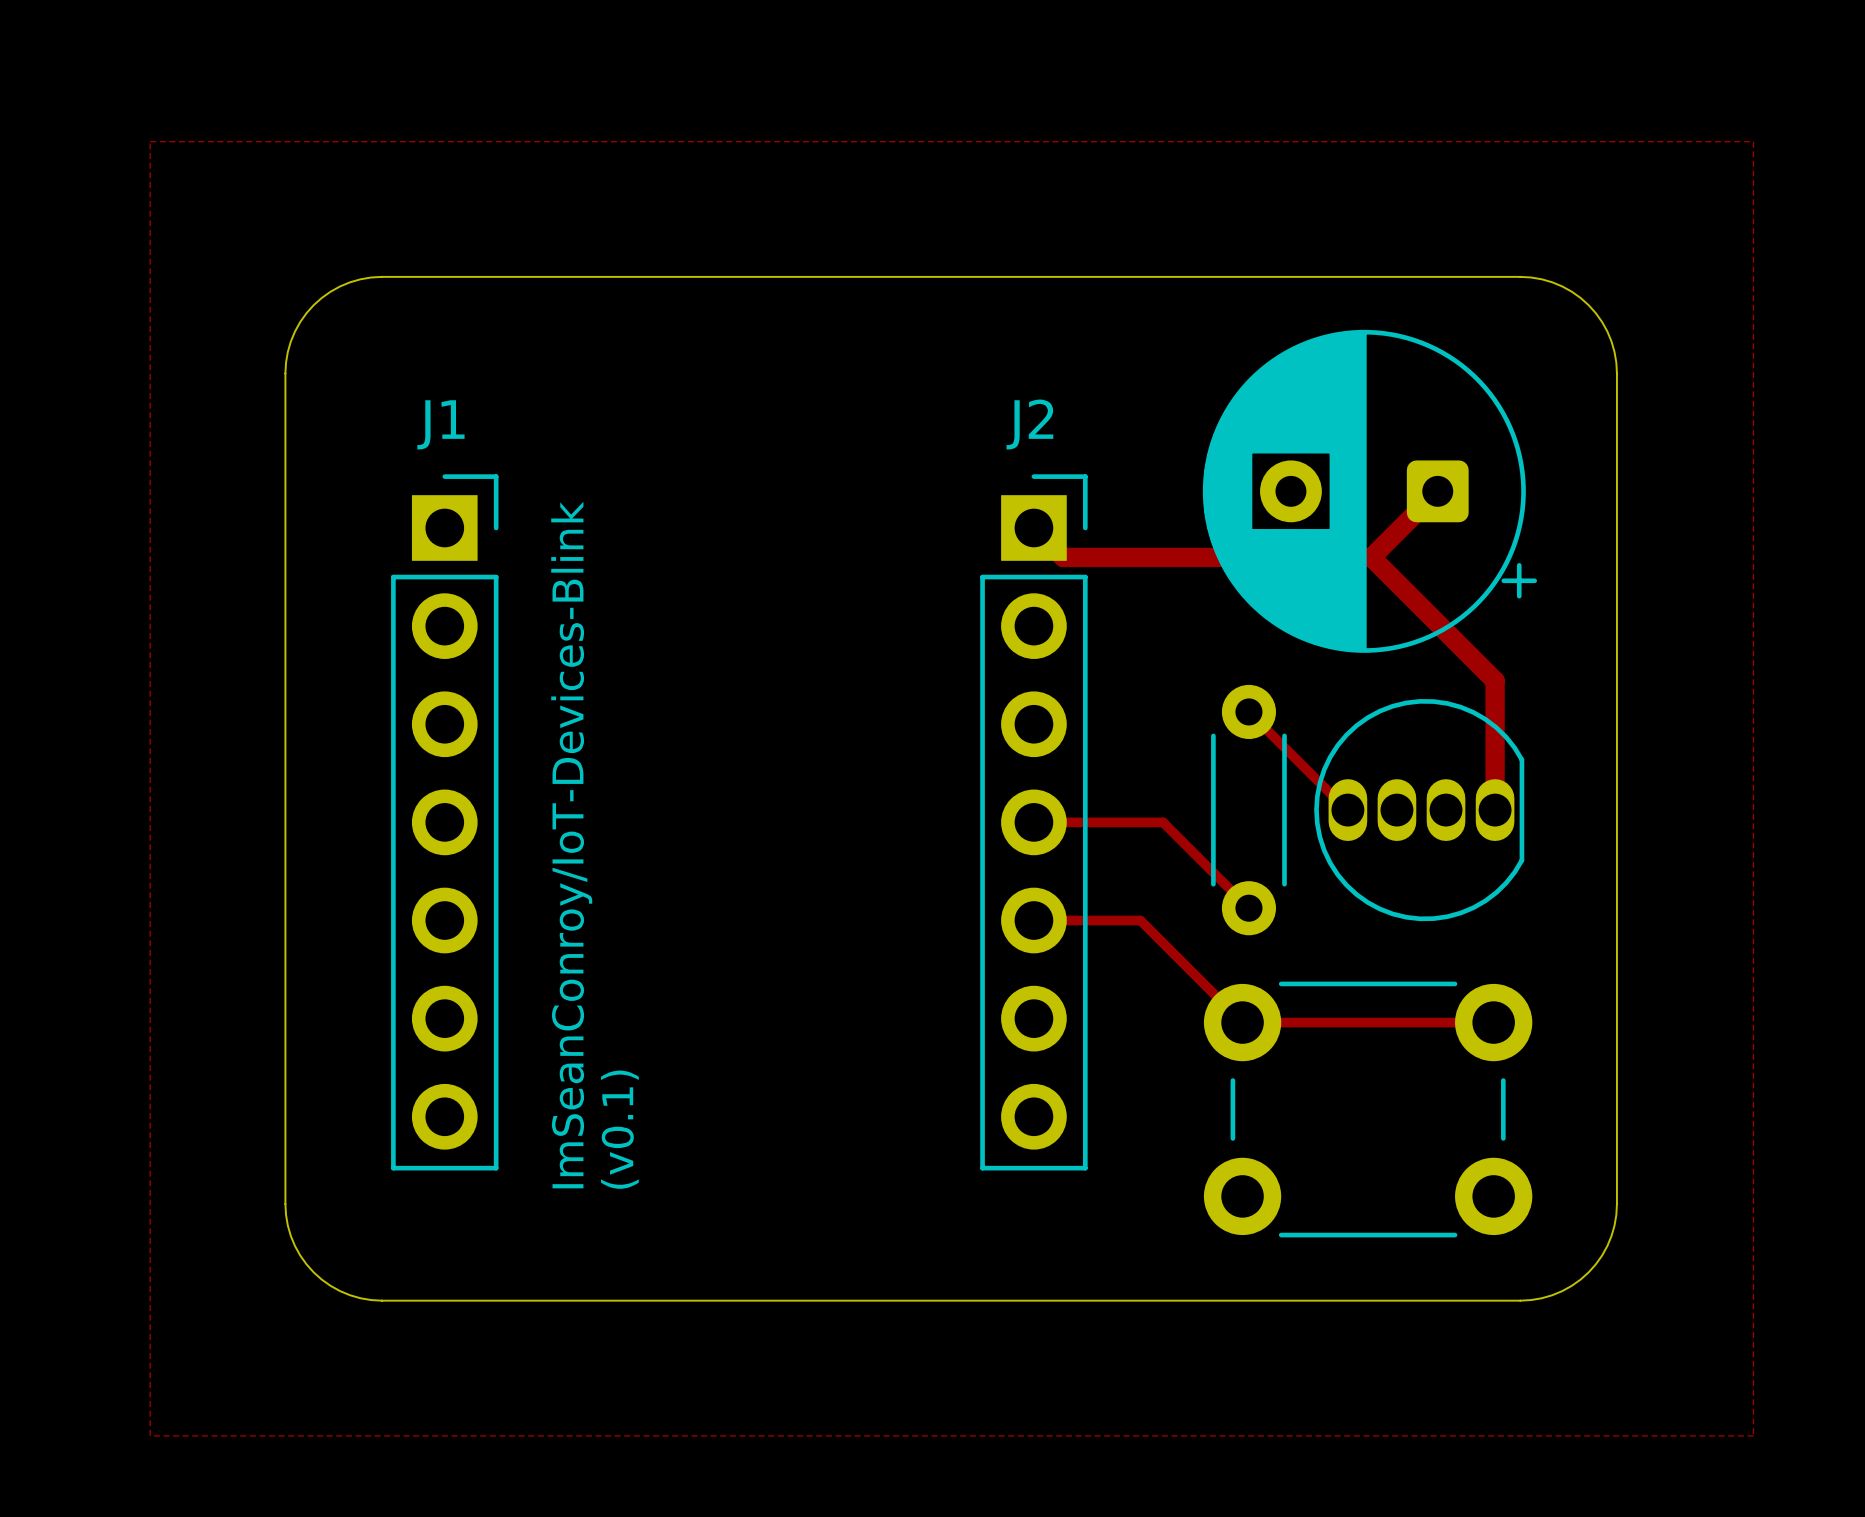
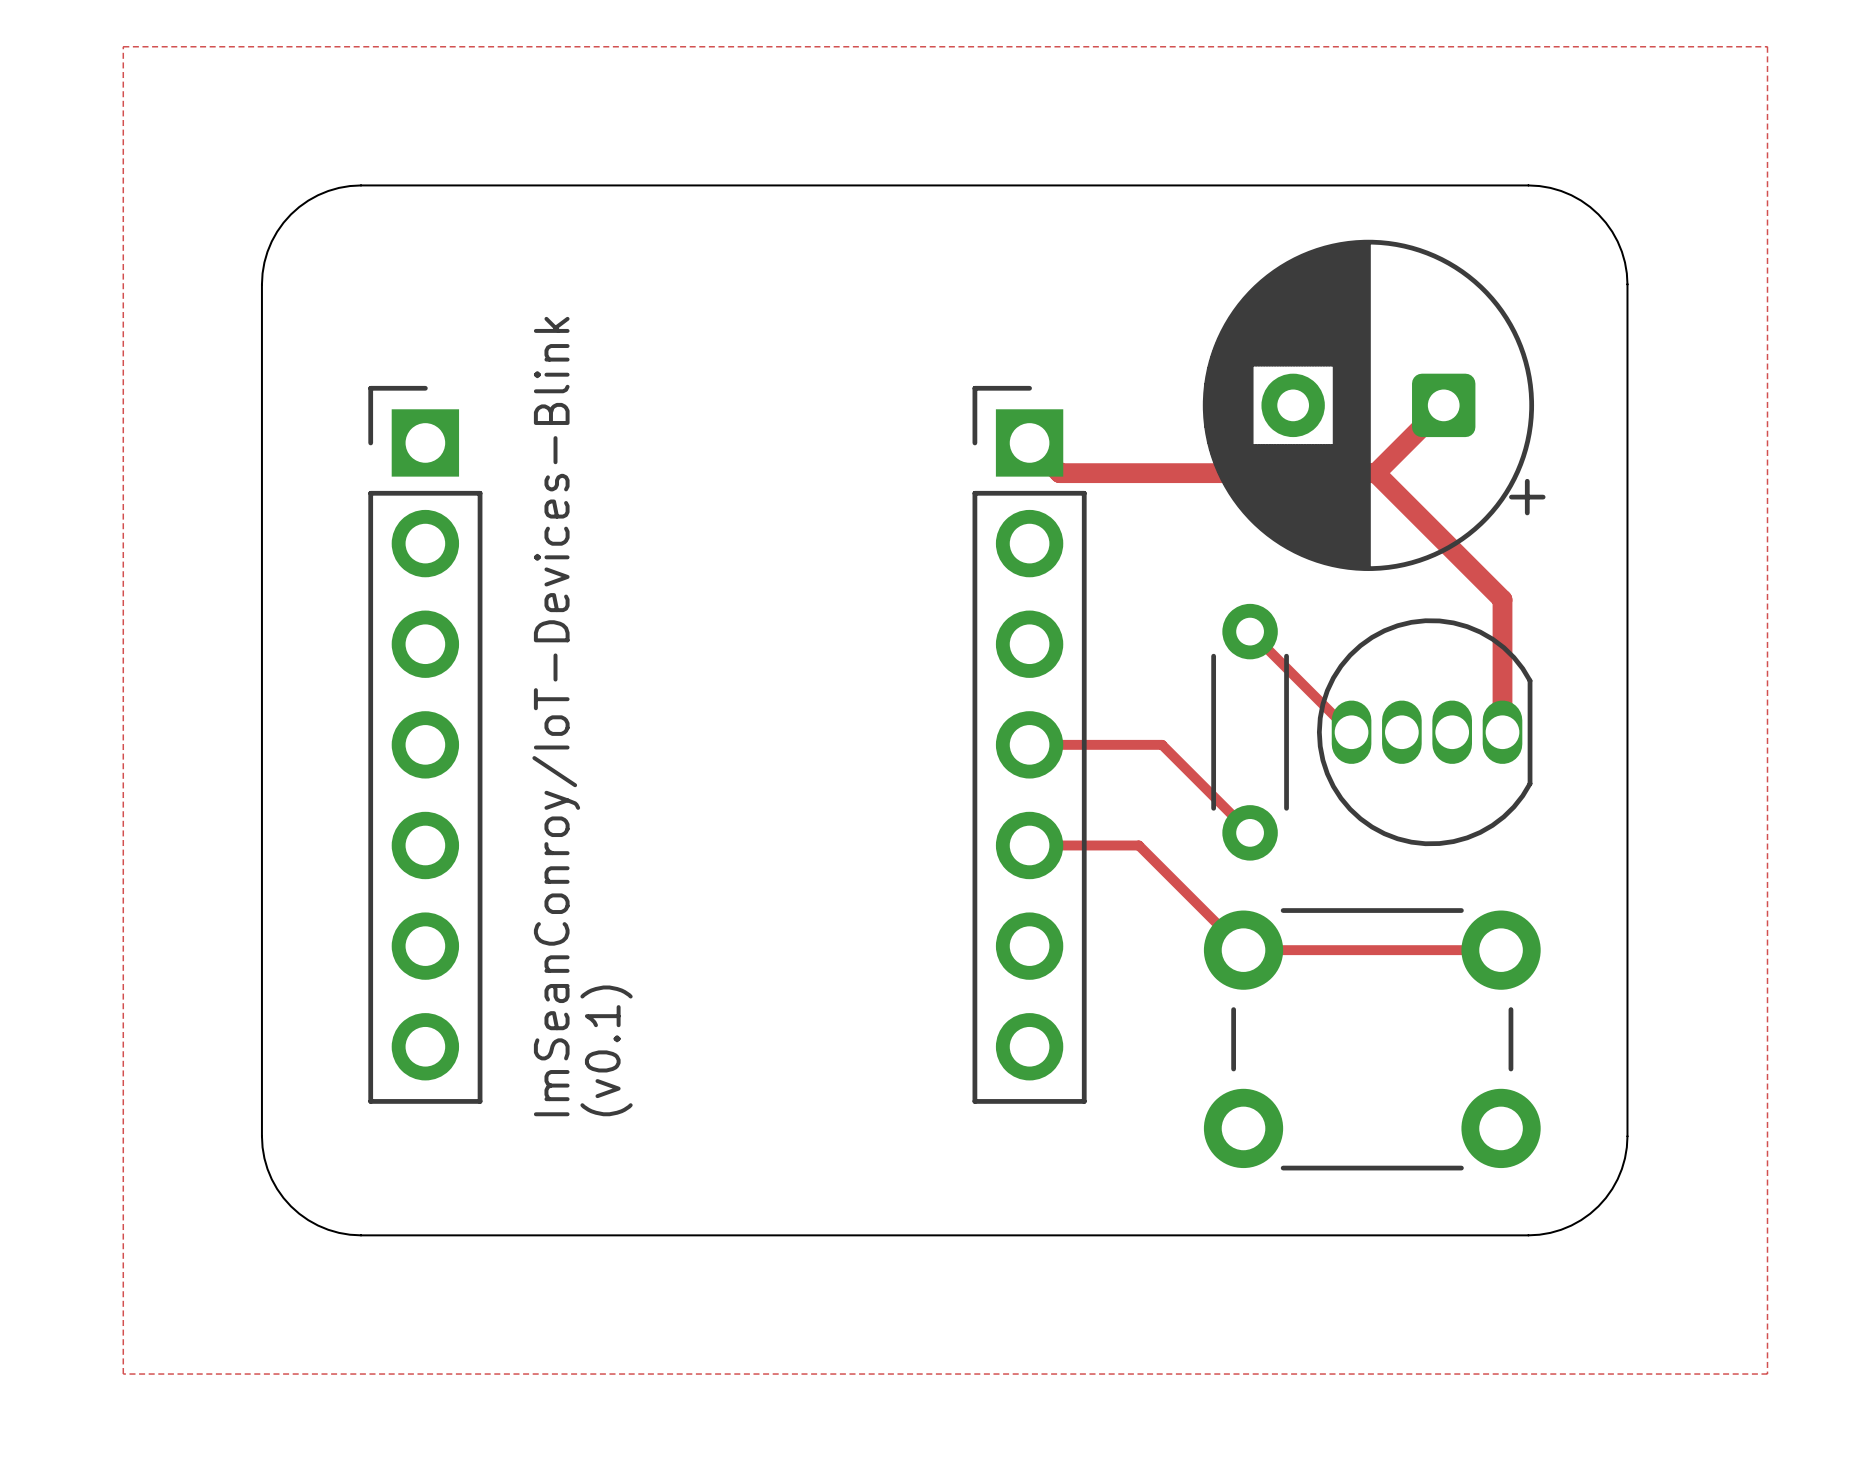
J1: (444, 822) -> none
part: none -> (425, 744)
J2: (1033, 822) -> none
part: none -> (1029, 744)

